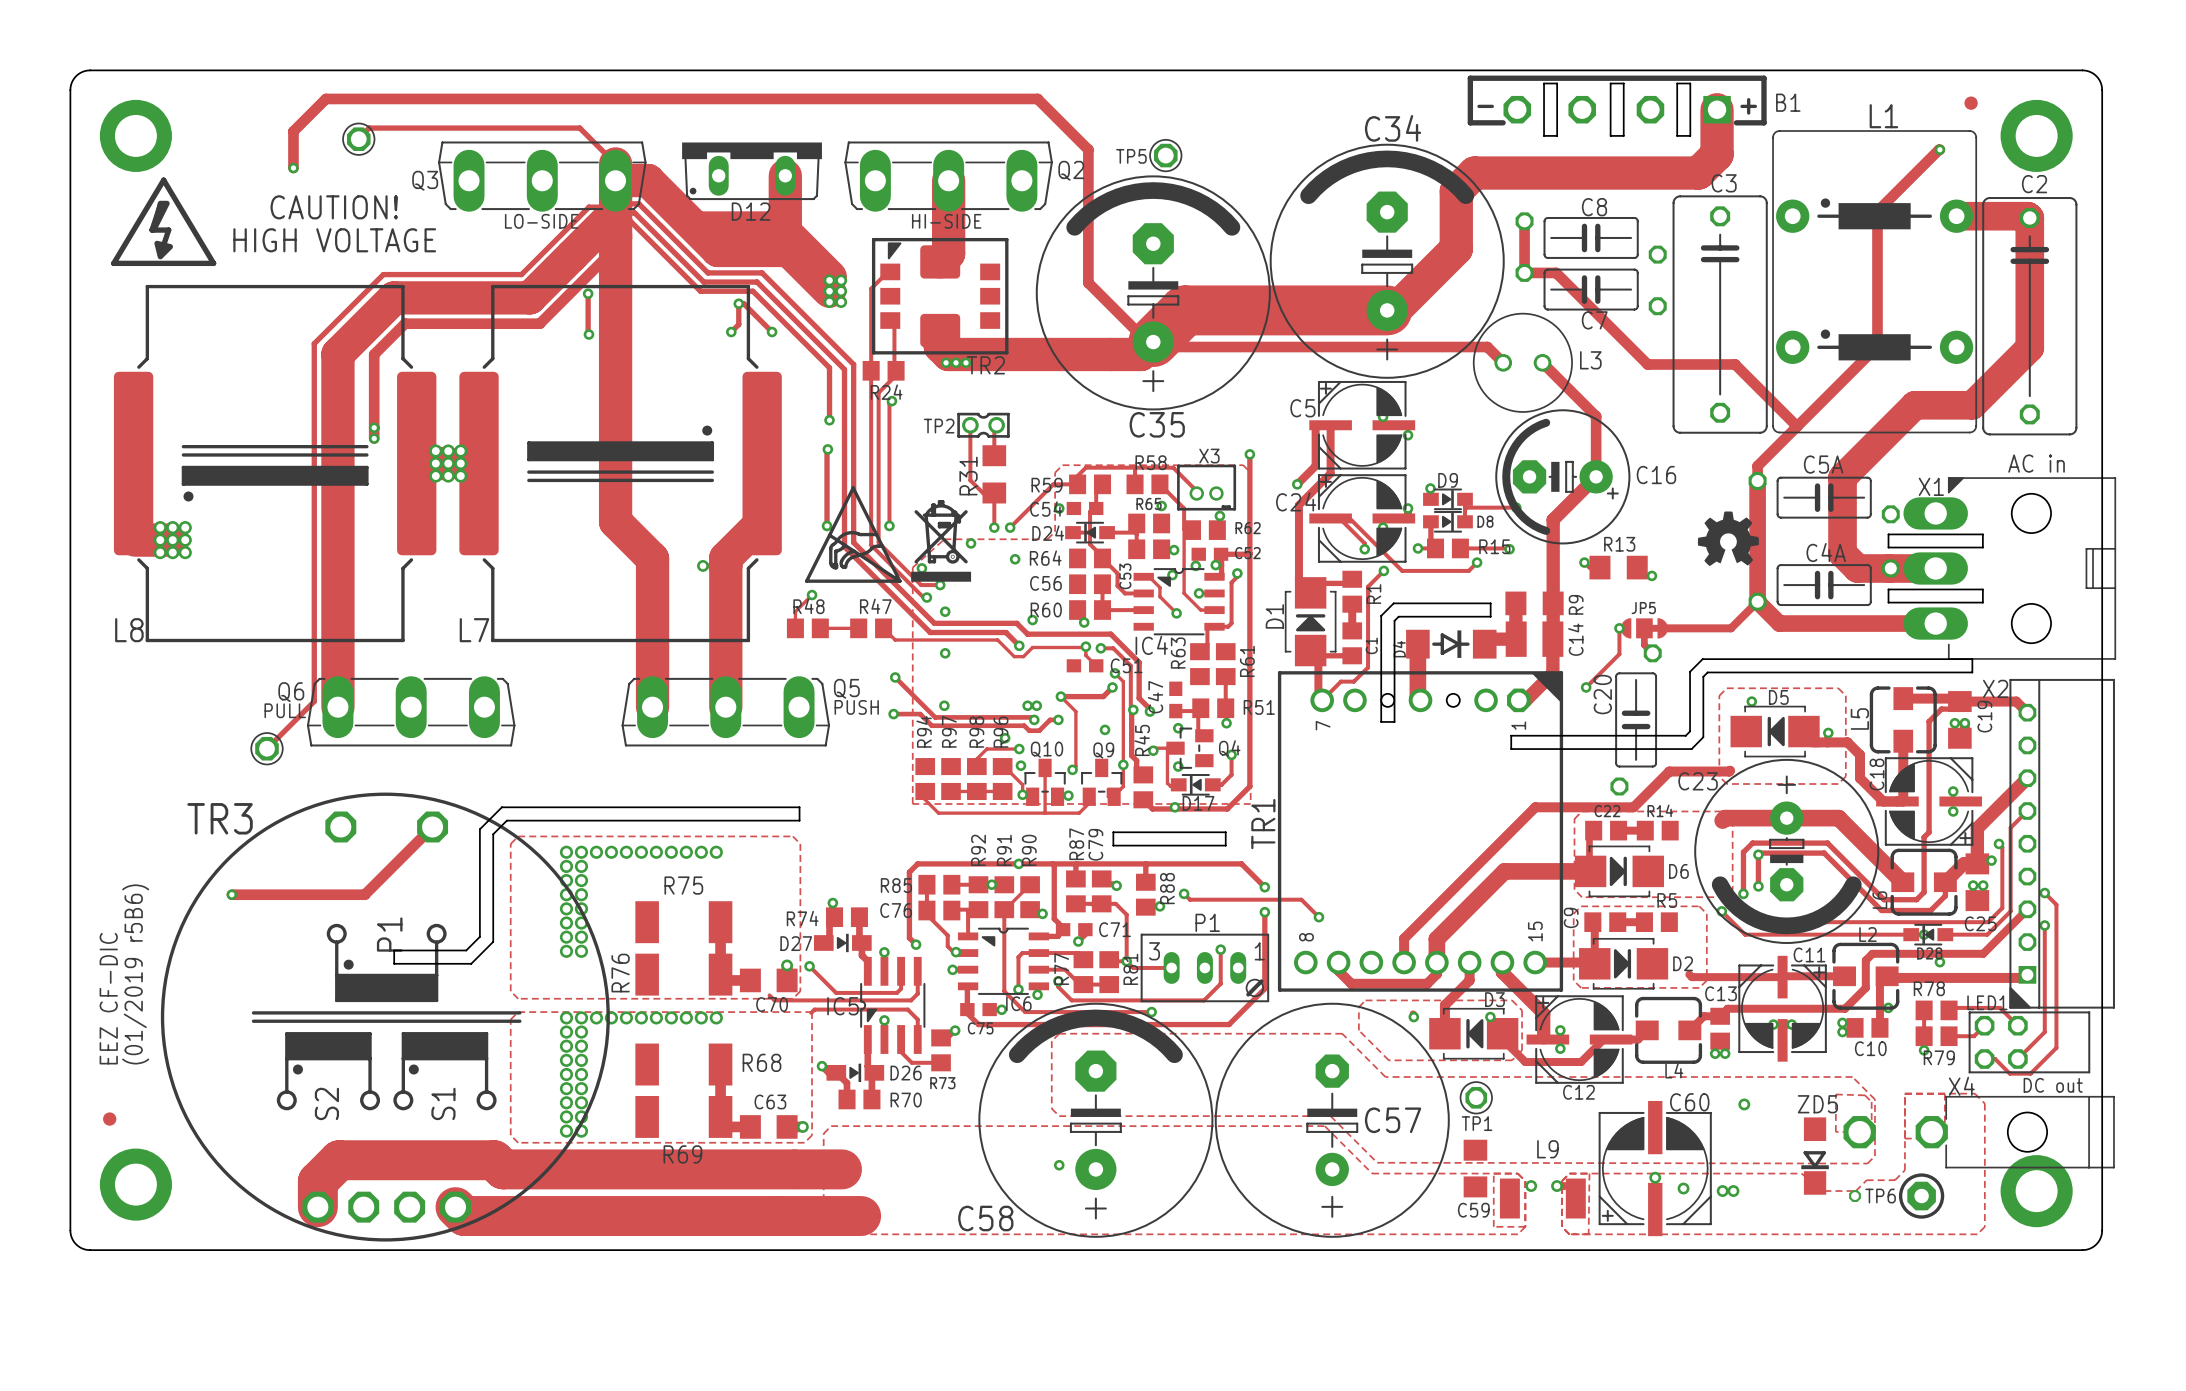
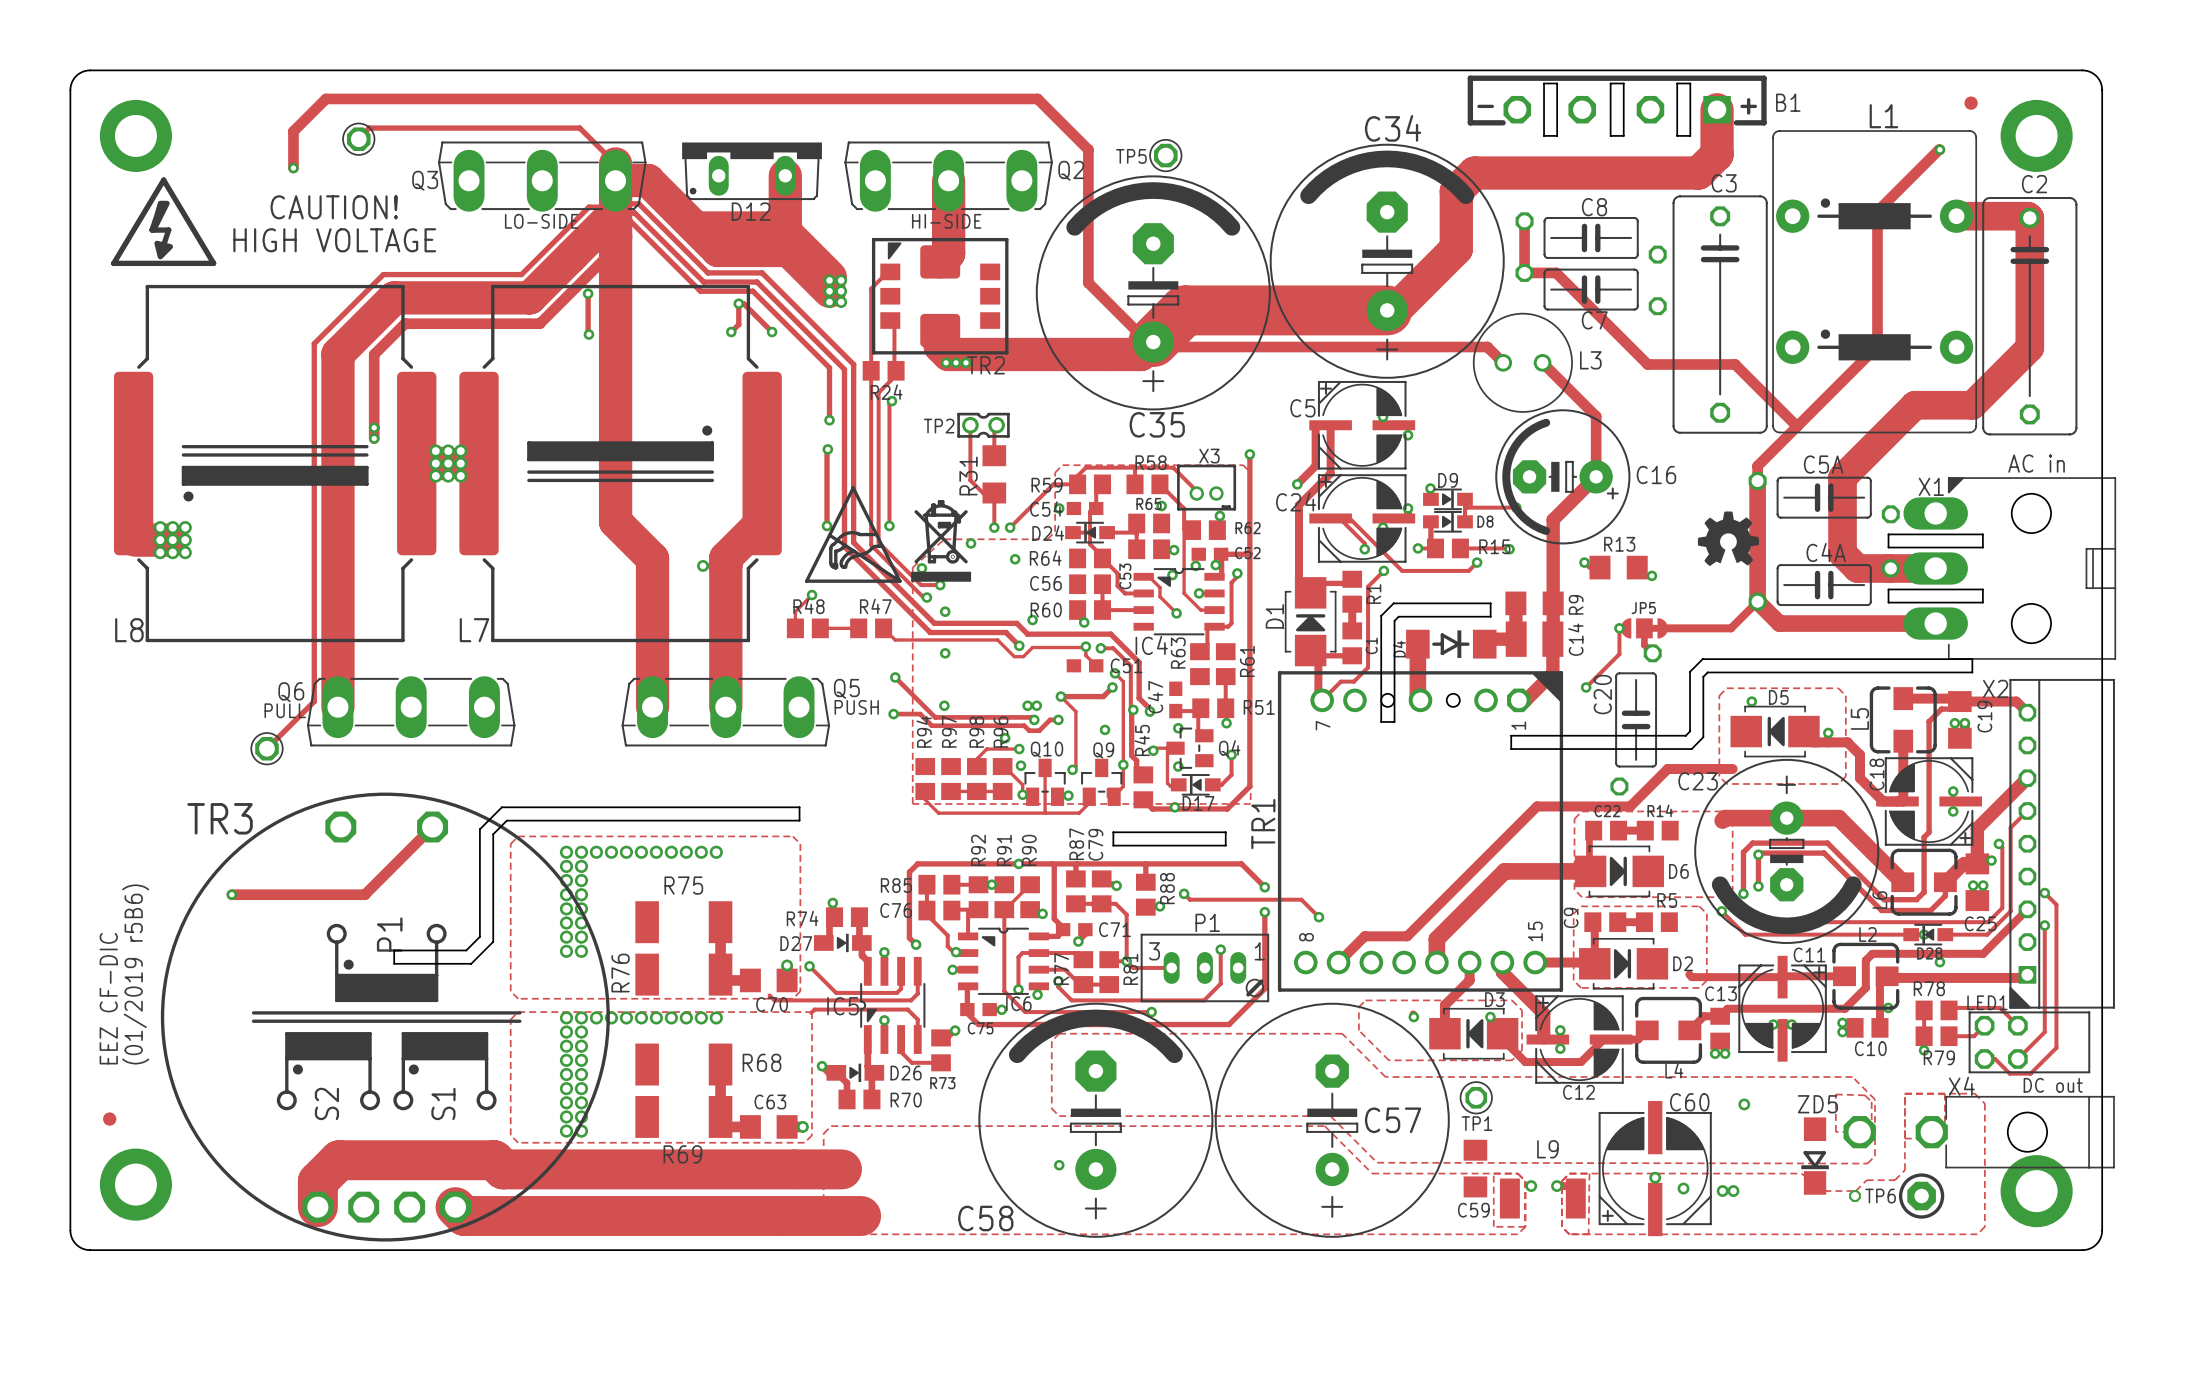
track: (1730, 770) (1669, 771) (1633, 807) (1535, 807) (1404, 938) (1404, 962) -> none
track: (1338, 962) (1338, 970) (1351, 983) (1427, 983) (1436, 974) (1436, 962) -> (1338, 962) (1364, 936) (1407, 936) (1537, 806) (1630, 806) (1667, 769) (1732, 769)

